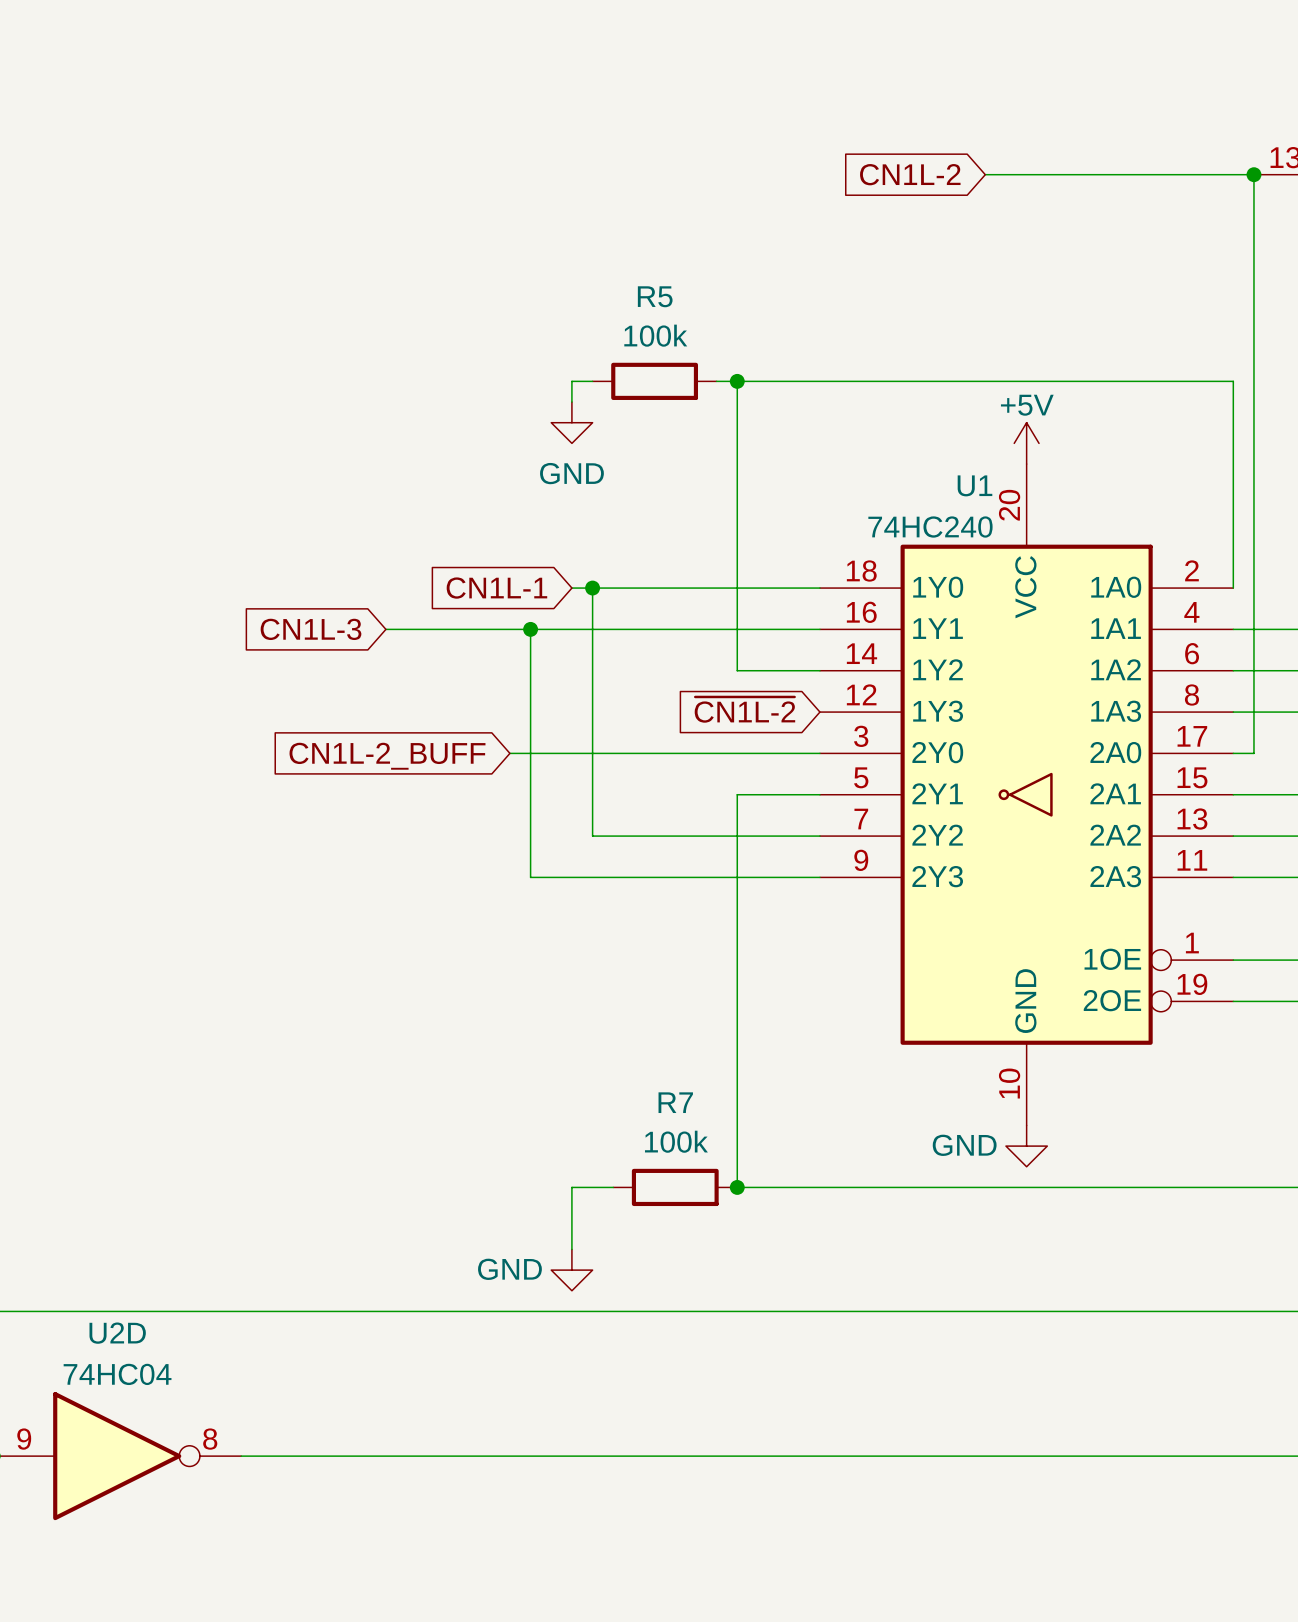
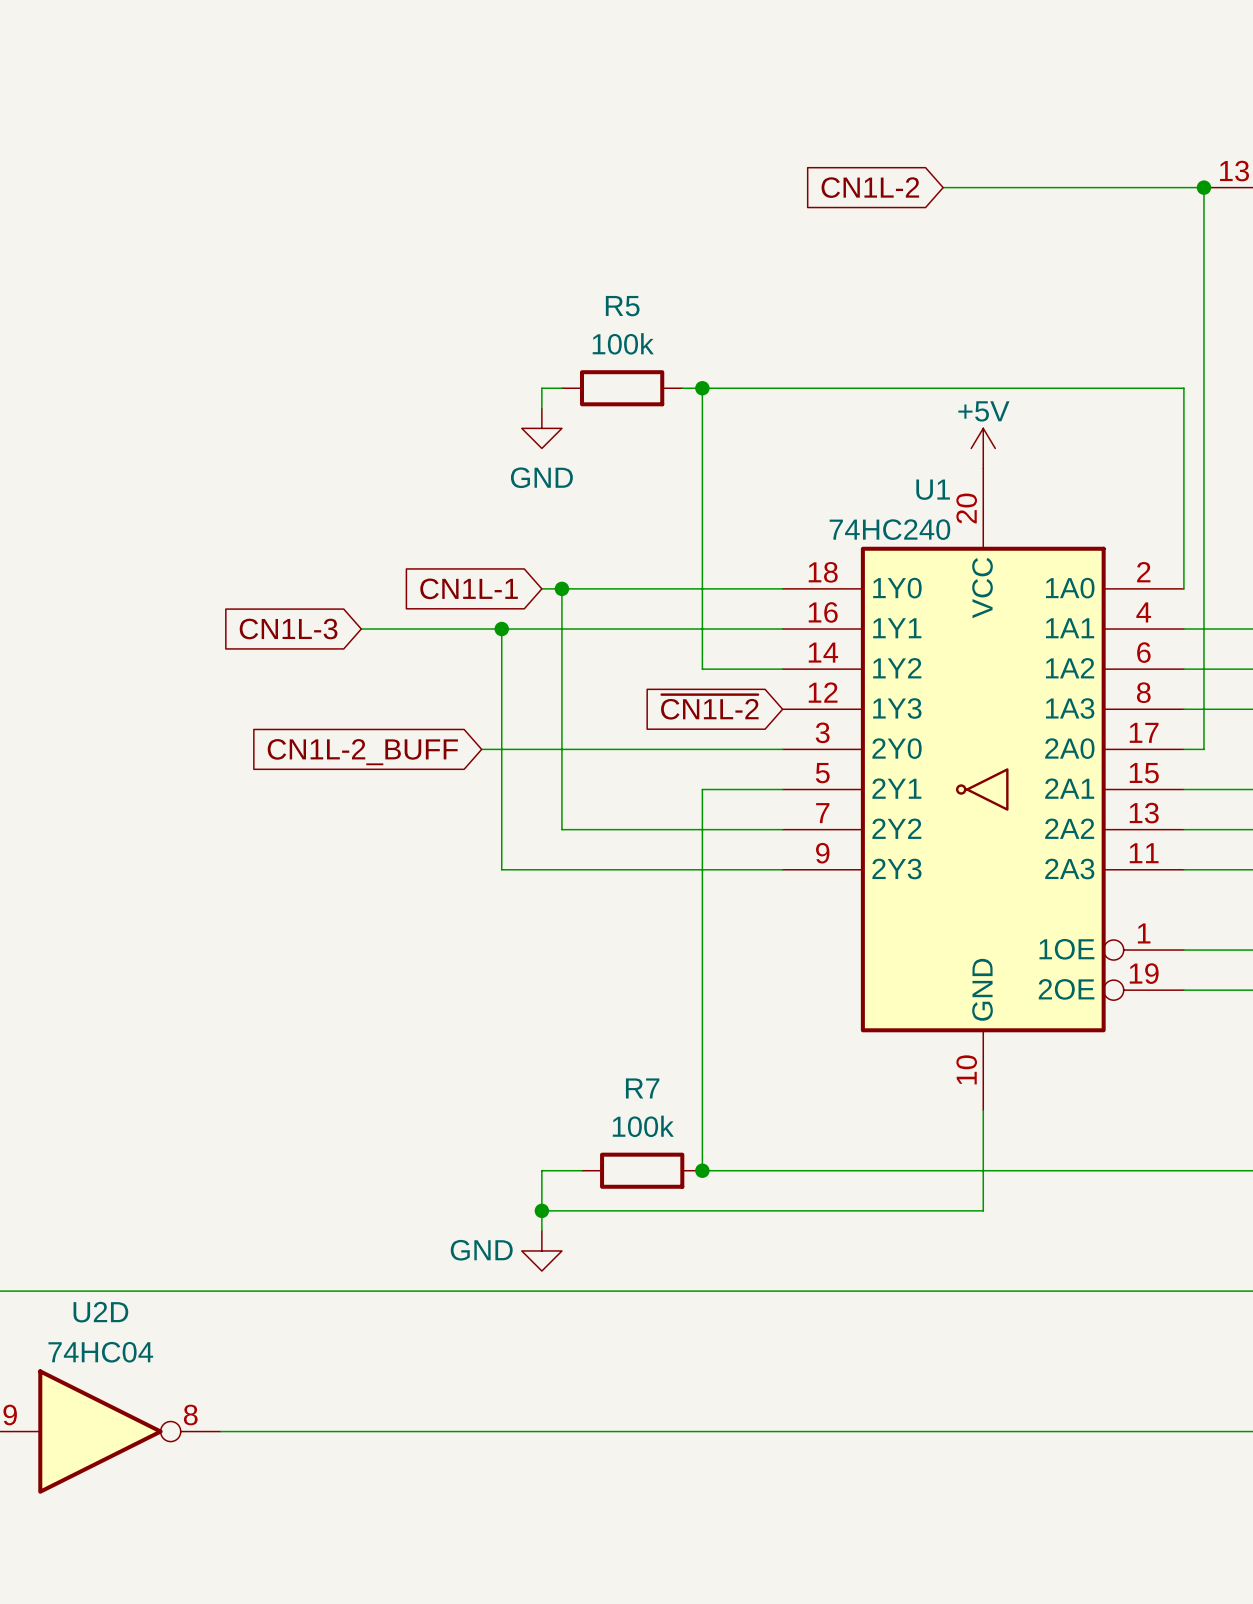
wire: none -> (983, 1110) (983, 1210) (541, 1210)
power symbol: GND (1026, 1146) -> none
junction: none -> (541, 1210)

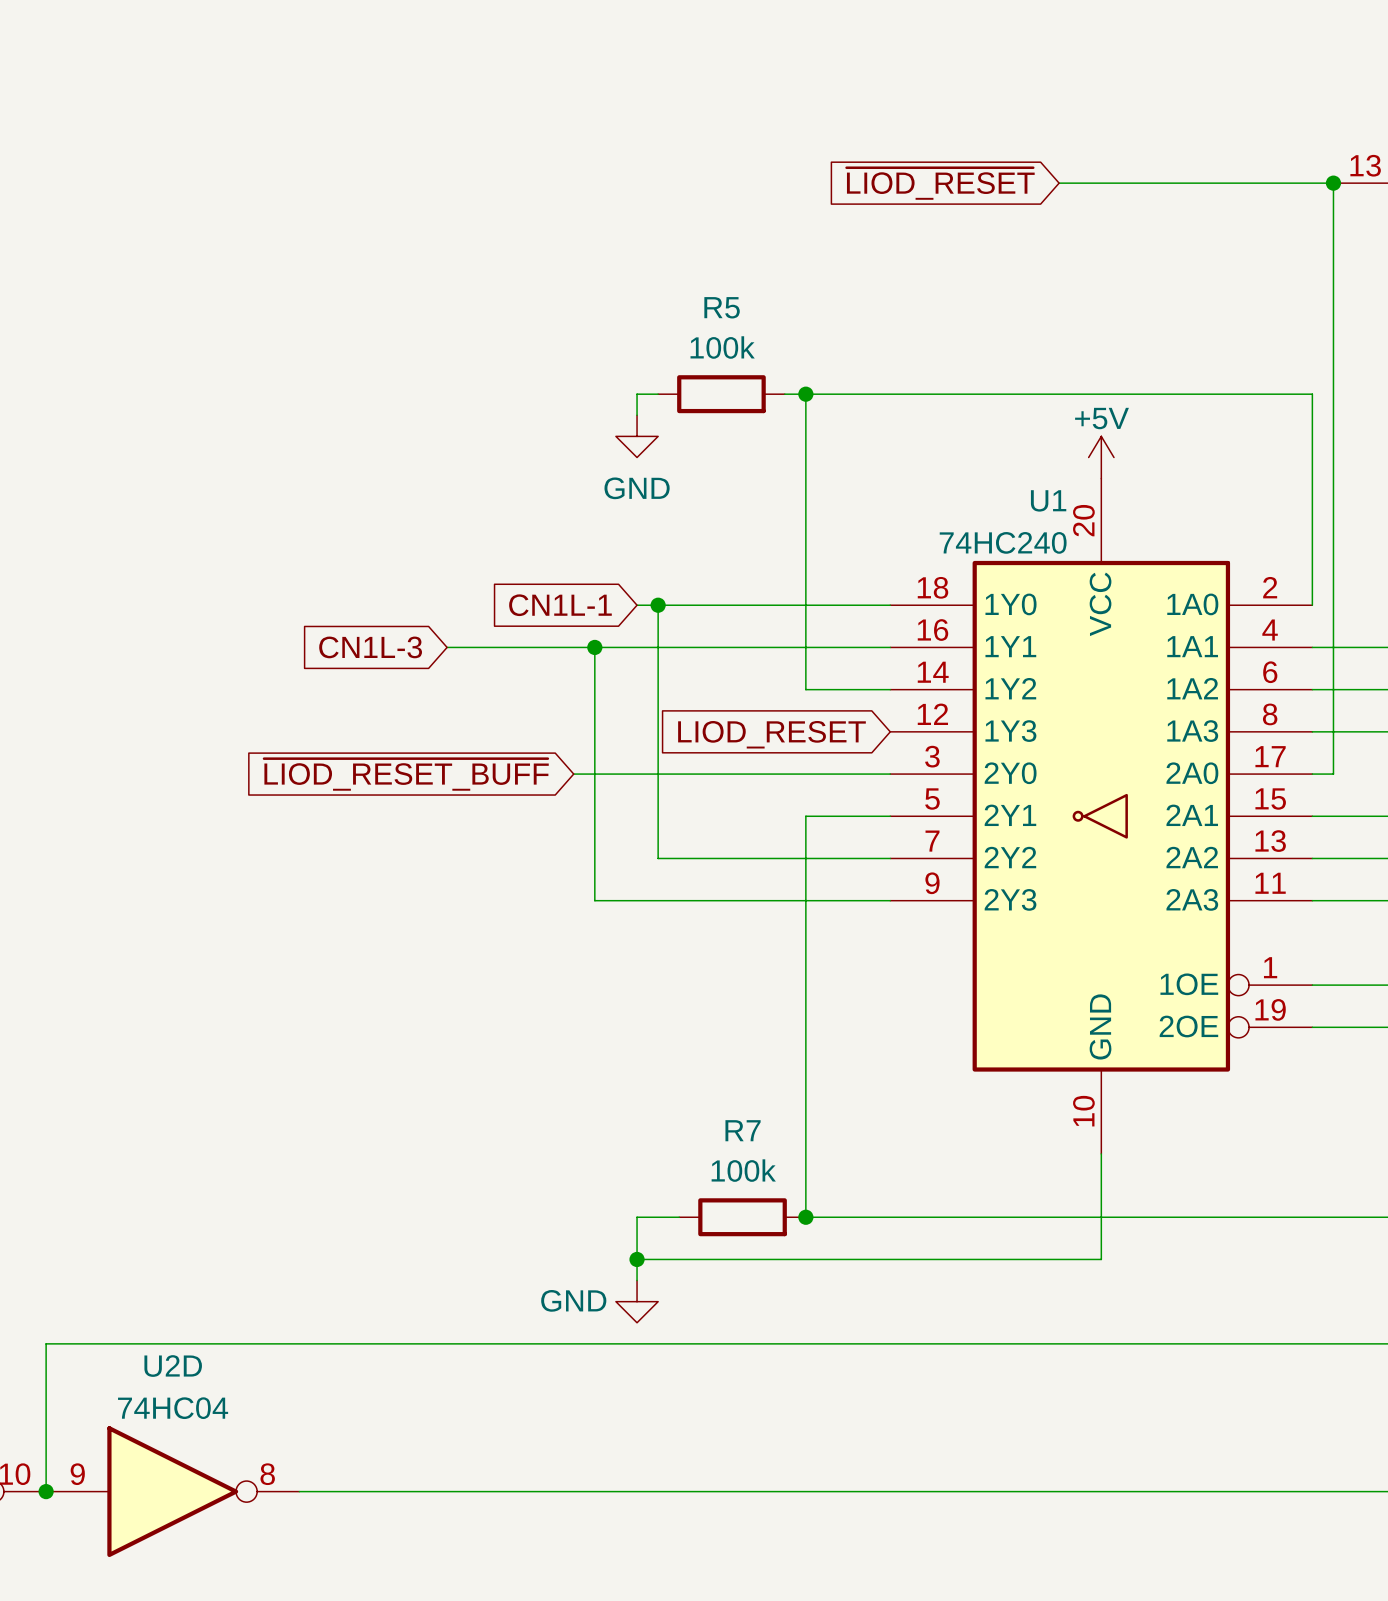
global label: CN1L-2 (870, 187) -> ~{LIOD_RESET} (940, 183)
global label: ~{CN1L-2} (709, 707) -> LIOD_RESET (771, 734)
global label: CN1L-2_BUFF (362, 752) -> ~{LIOD_RESET_BUFF} (406, 774)

